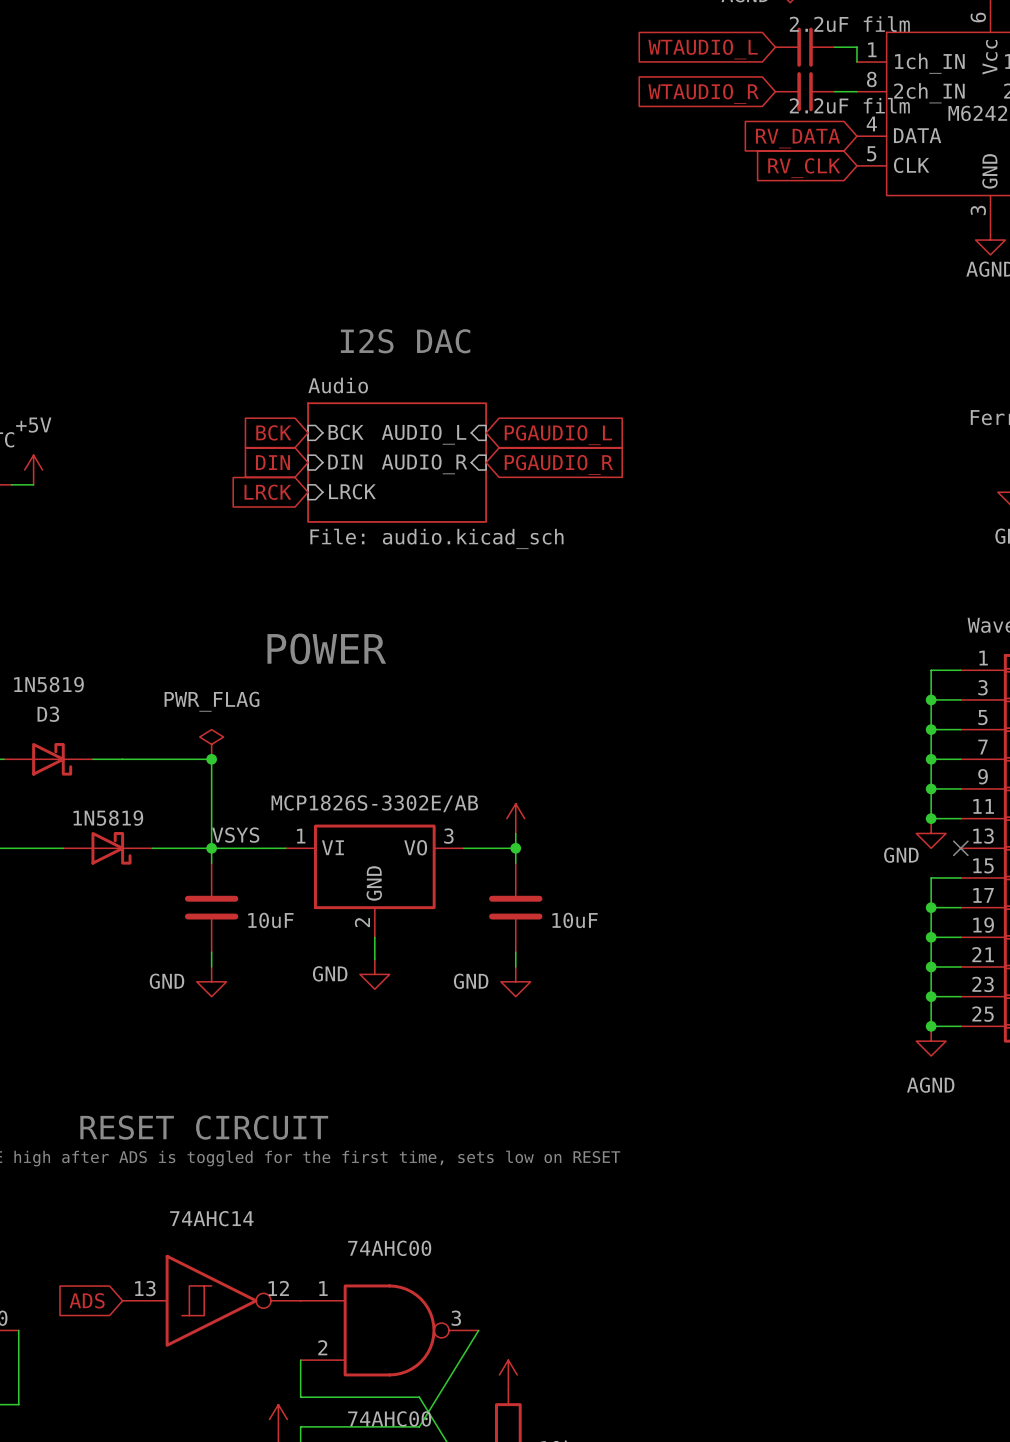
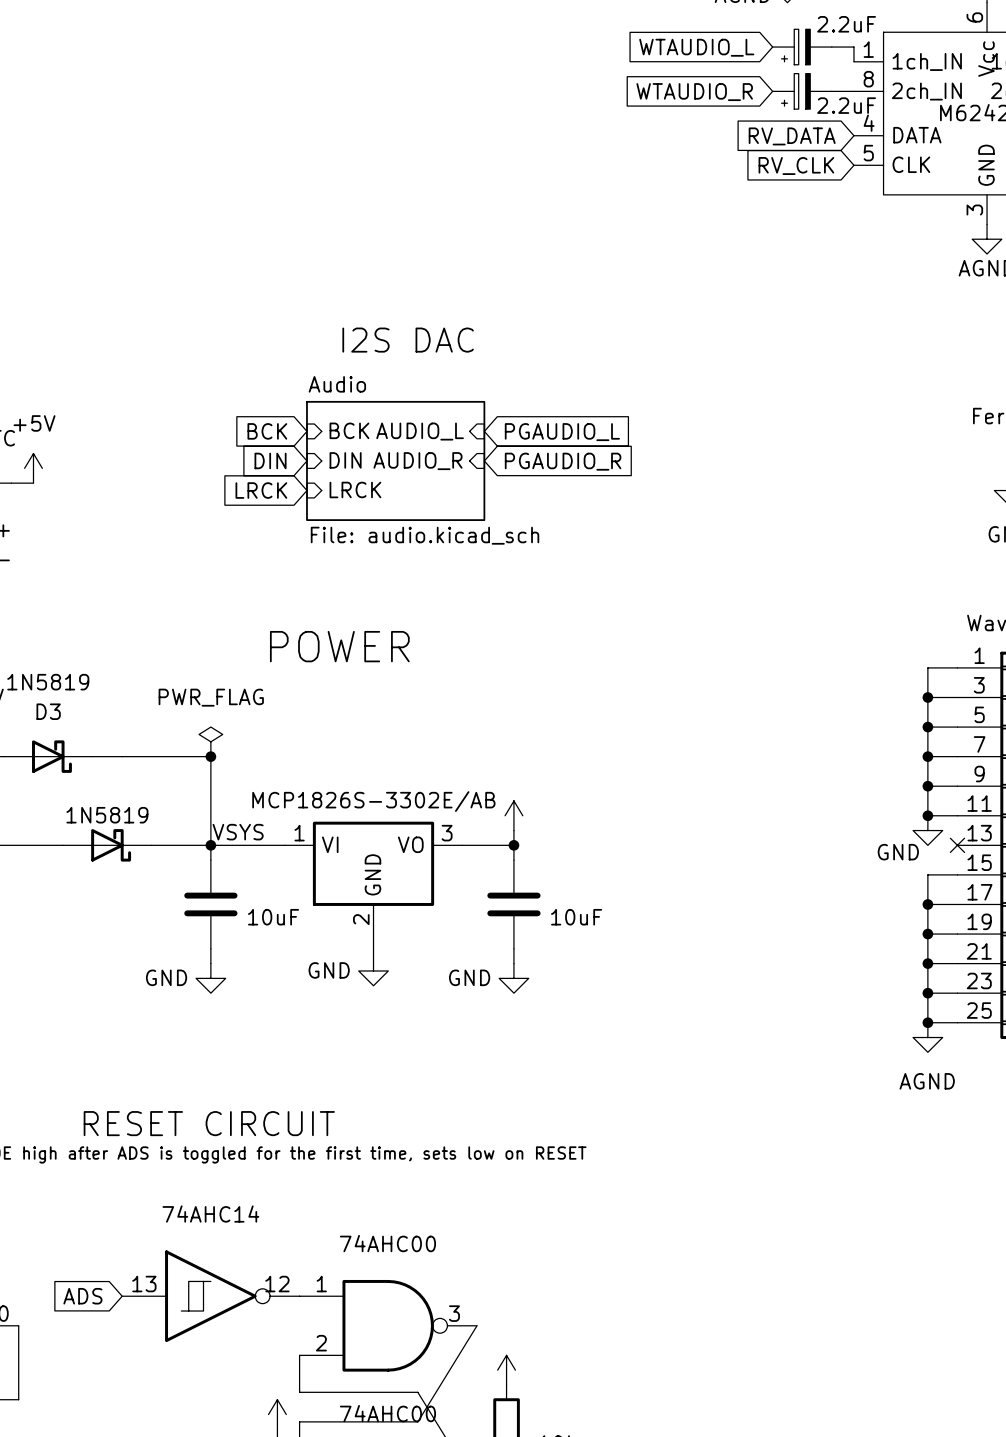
part value: 2.2uF film (849, 24) -> 2.2uF (846, 24)
part symbol: [775, 27, 835, 67] -> [772, 29, 832, 65]
part symbol: [775, 72, 835, 112] -> [772, 73, 832, 110]
part value: 2.2uF film (849, 105) -> 2.2uF (846, 105)

